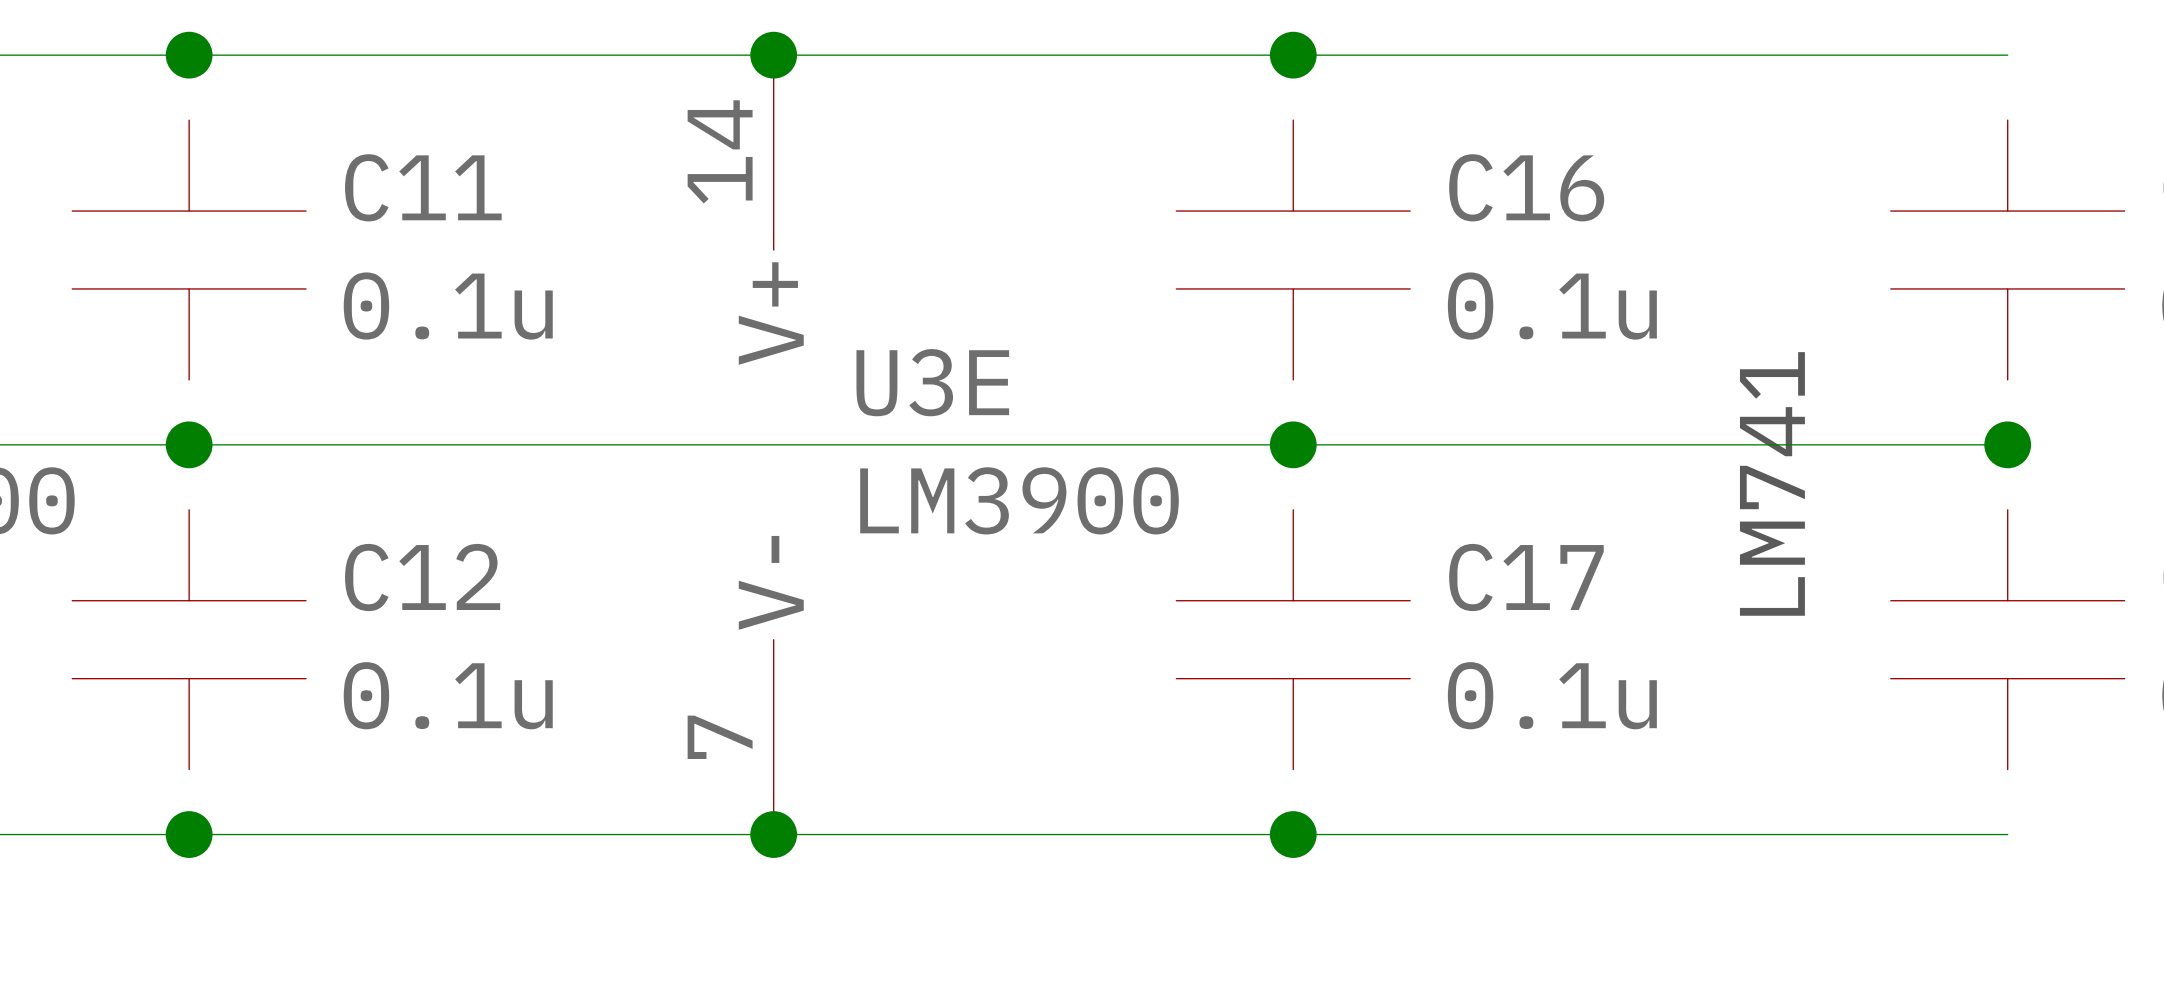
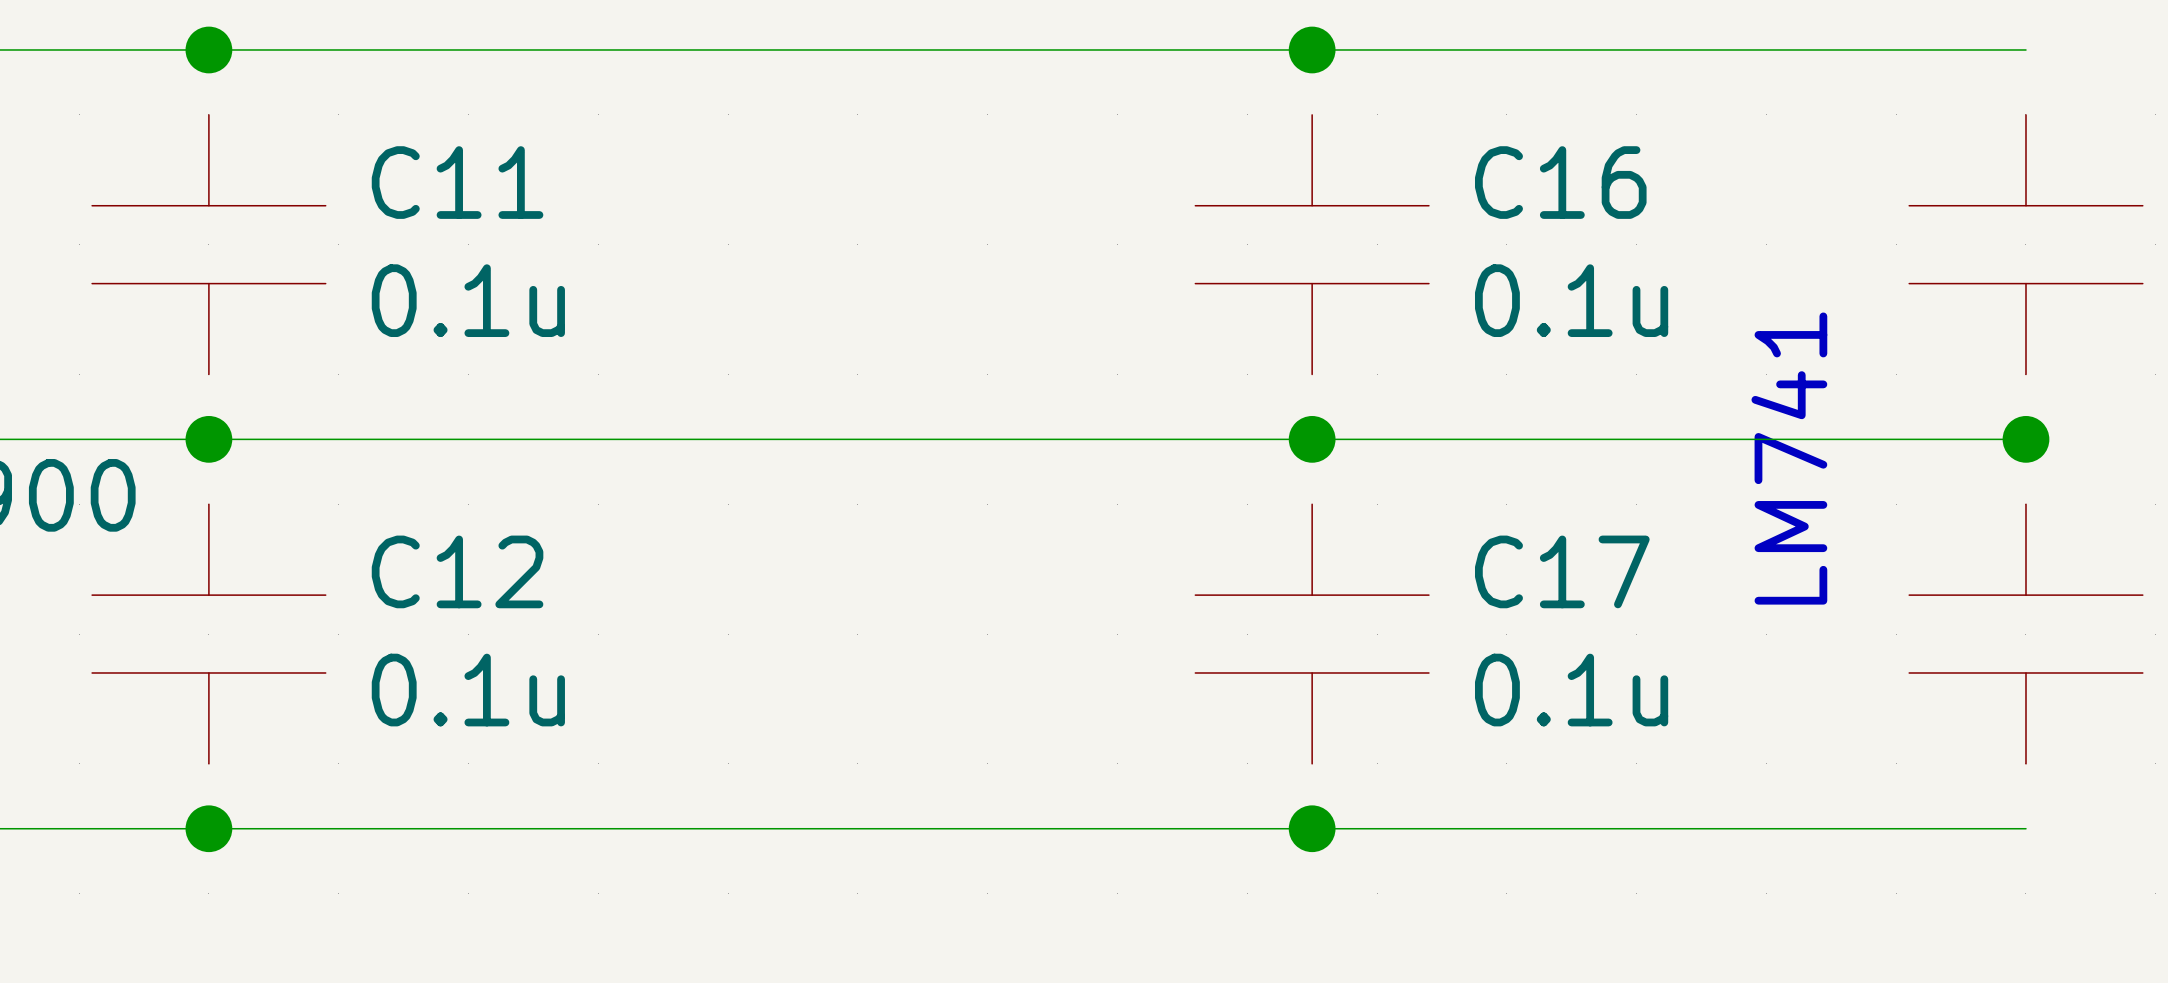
junction: (773, 55) -> none
U3E: LM3900 (773, 444) -> none
junction: (773, 834) -> none

